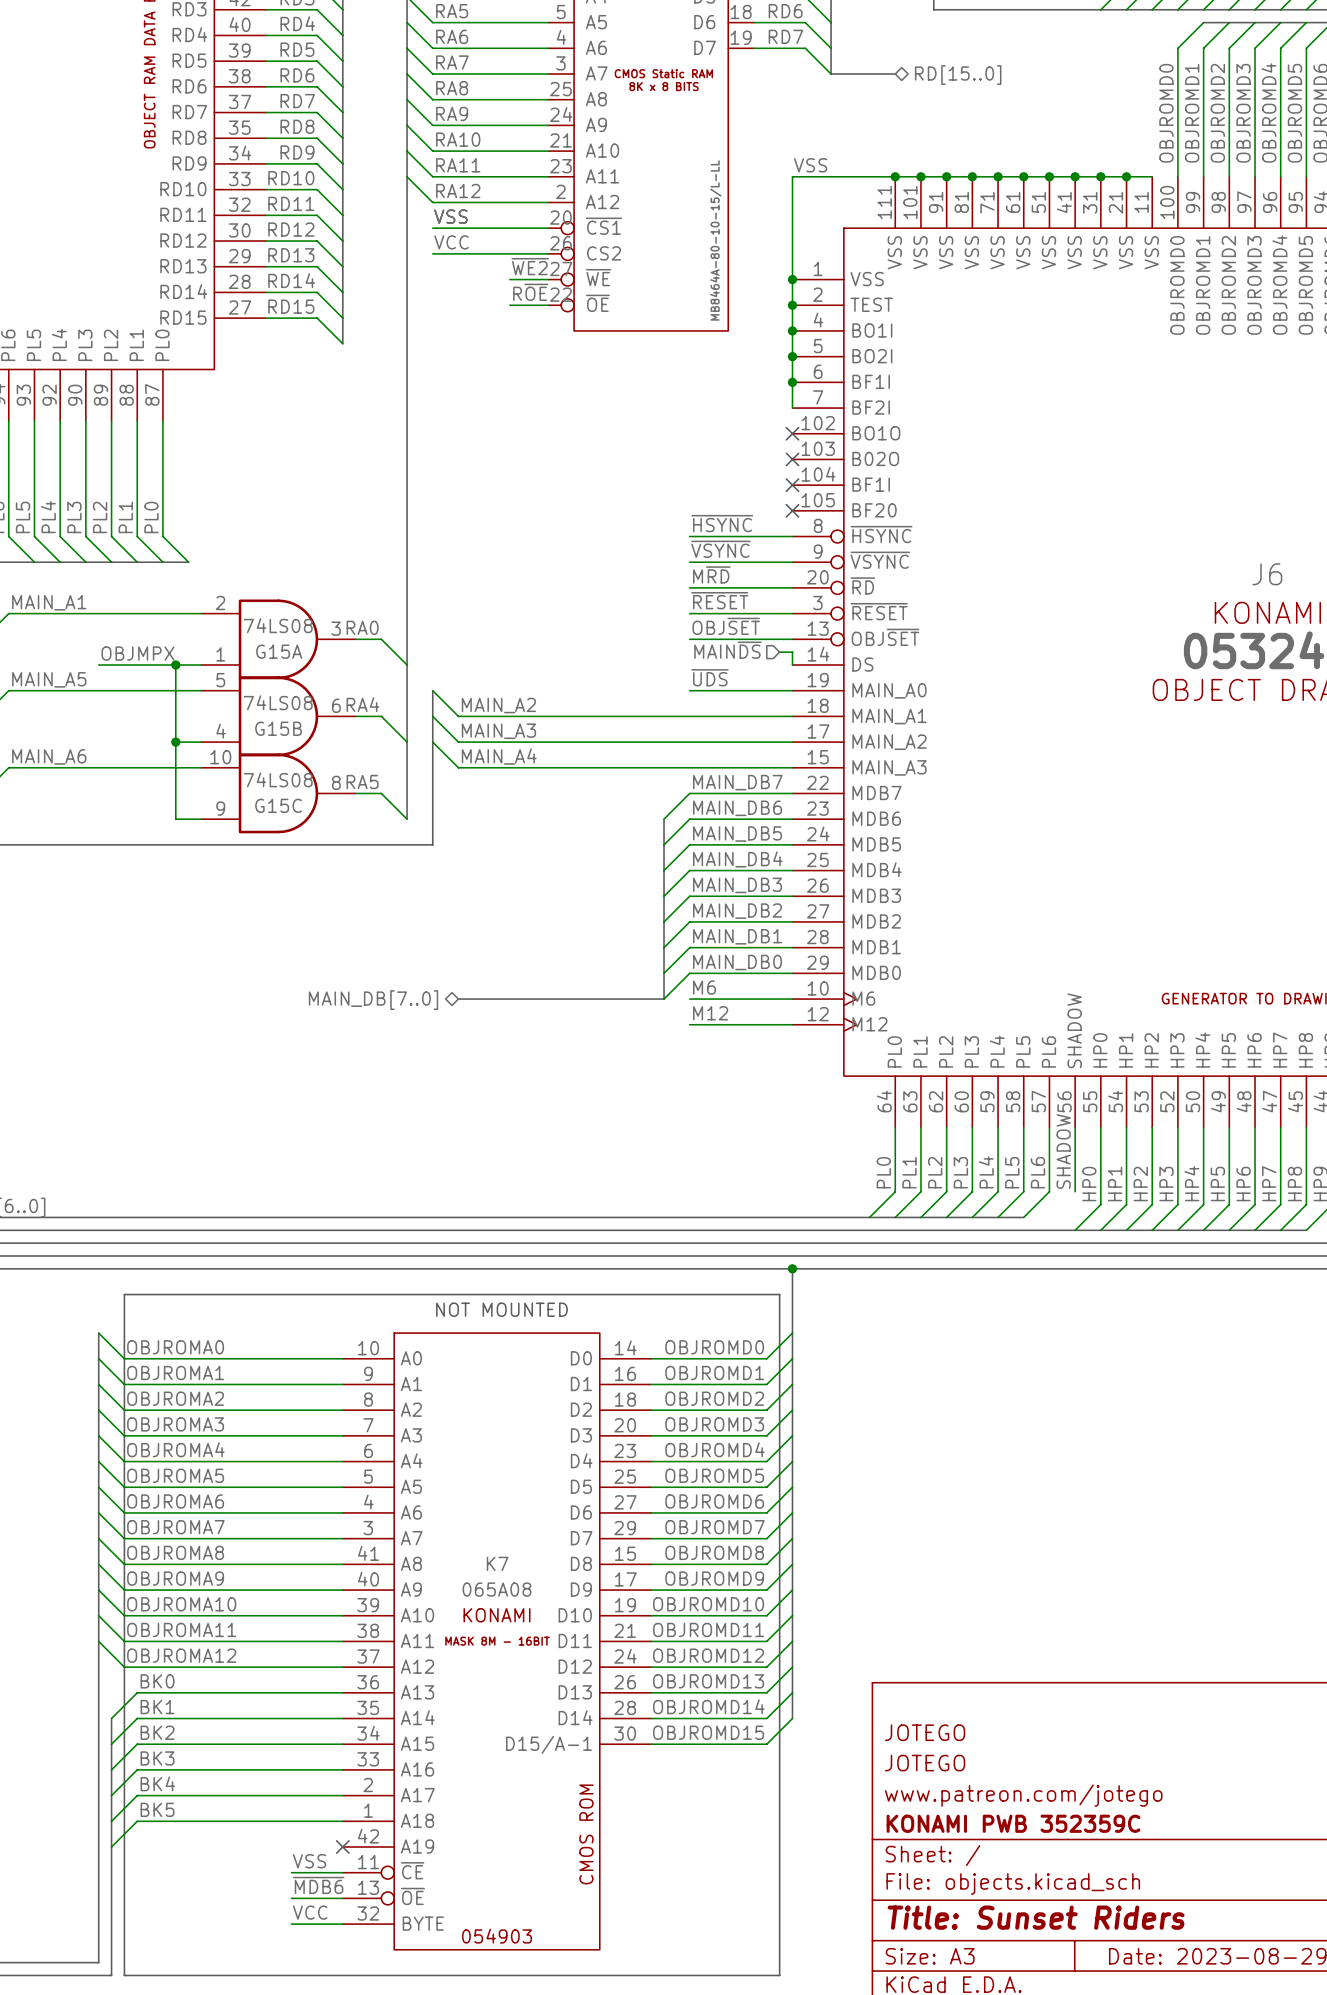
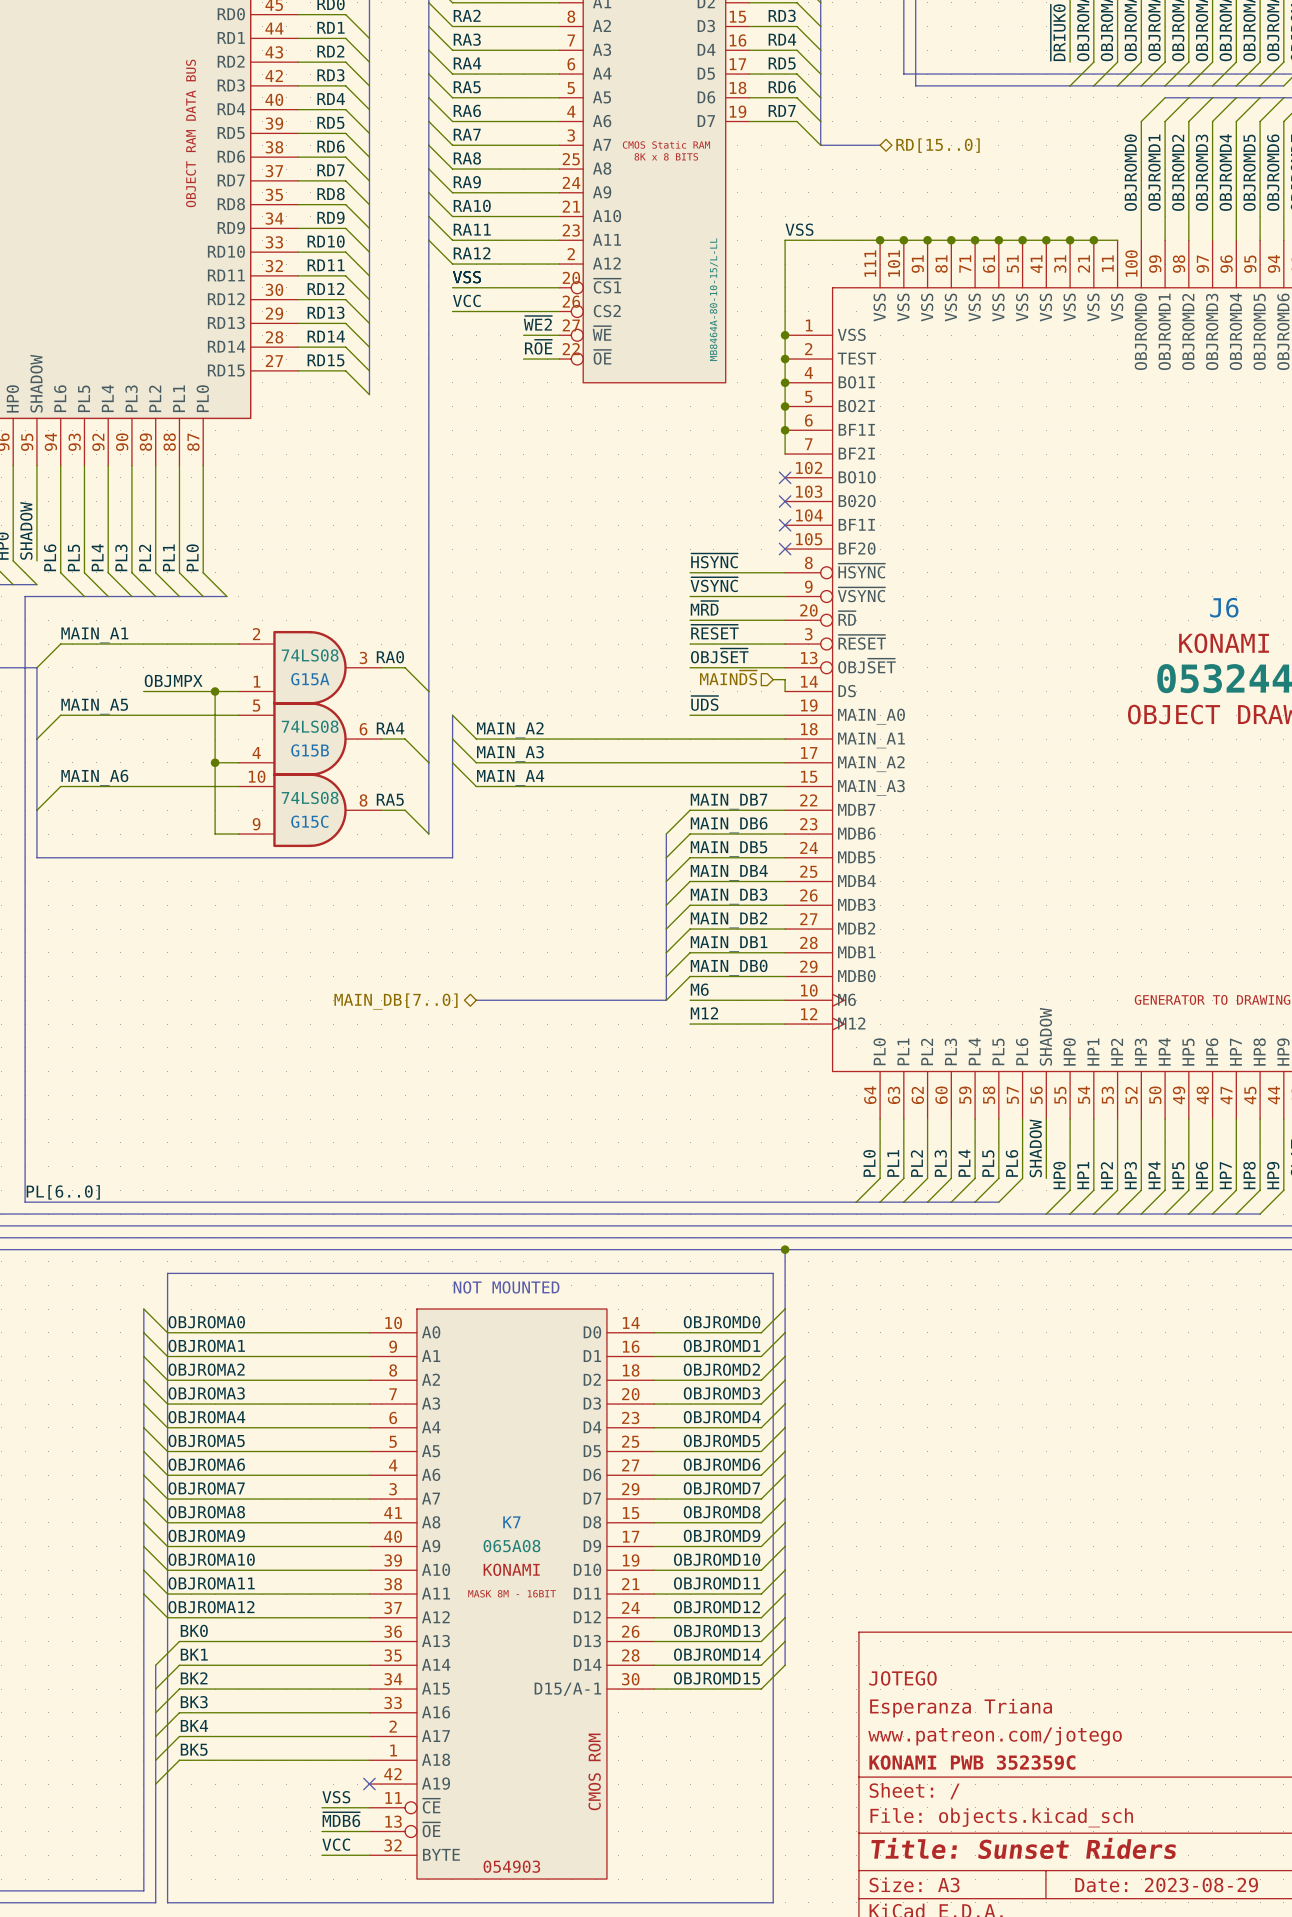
title block: JOTEGO (925, 1763) -> Esperanza Triana (961, 1708)

